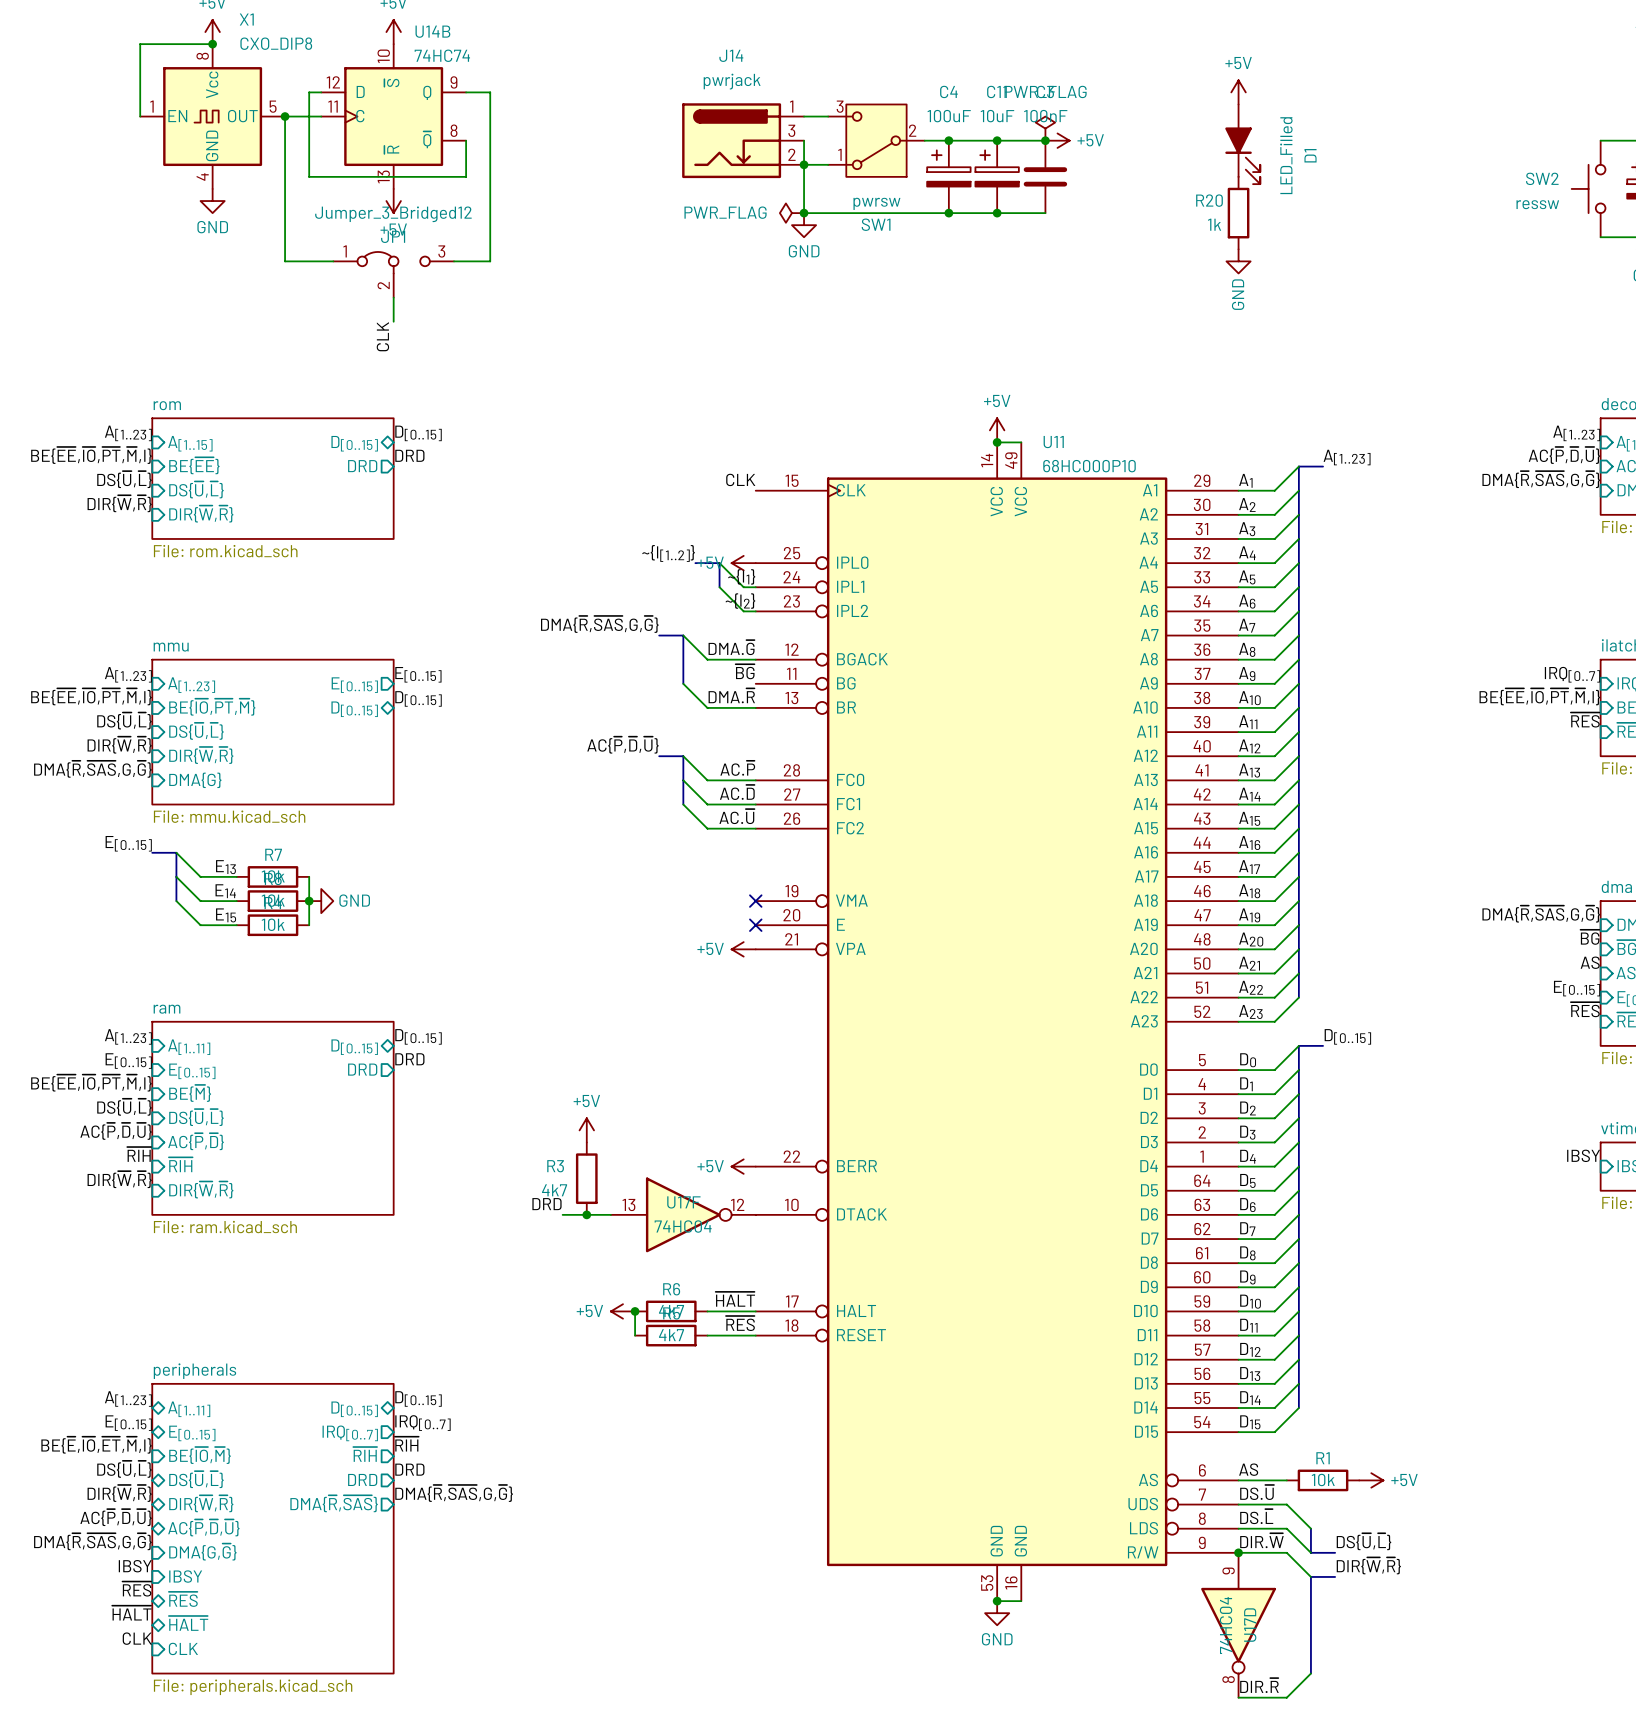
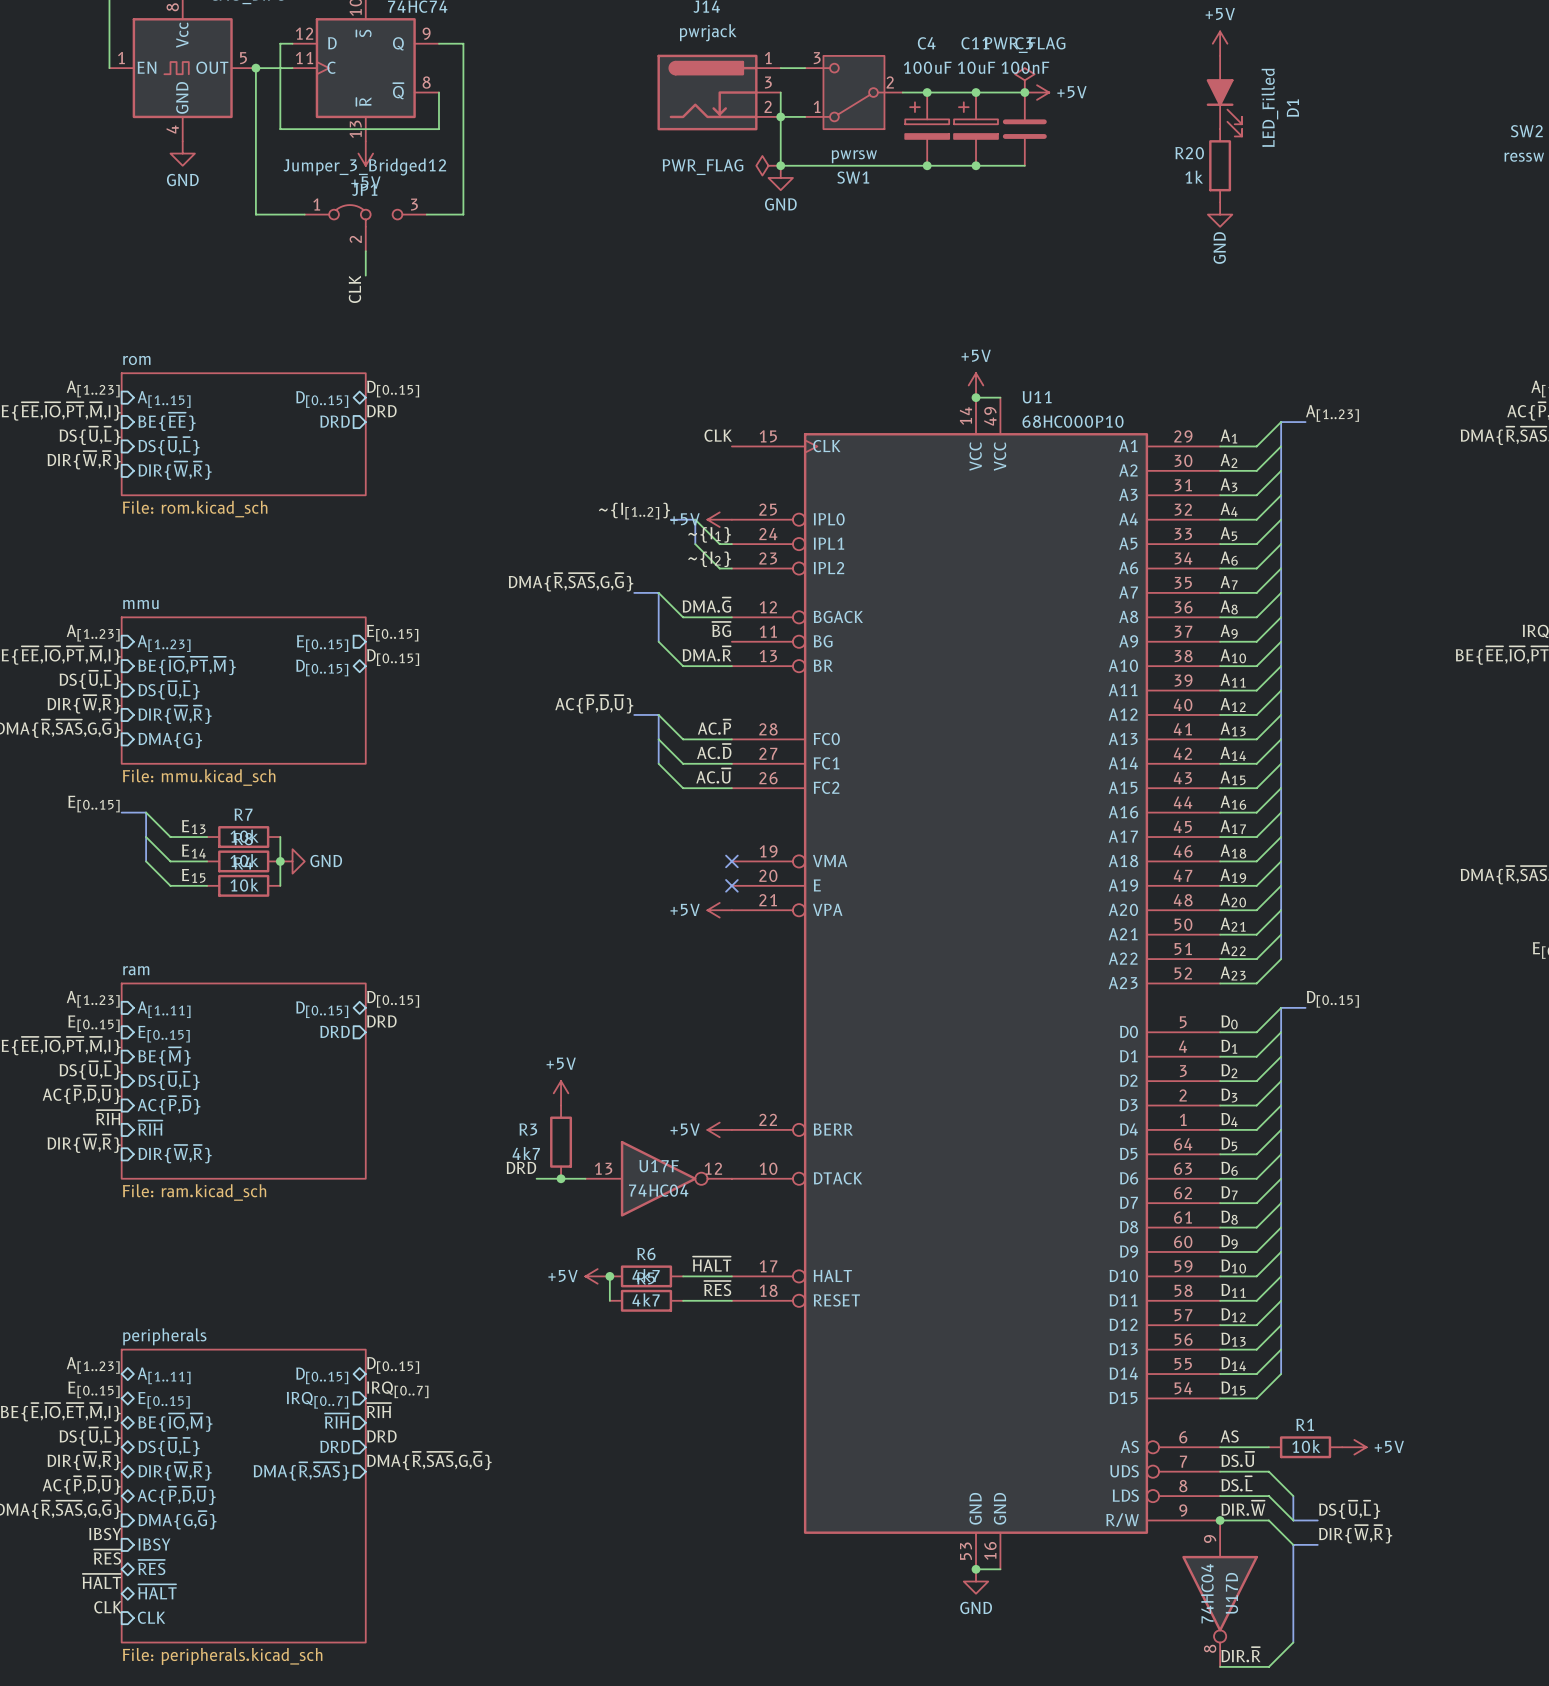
sheet pin shape: input (200, 1455) -> bidirectional (175, 1422)

